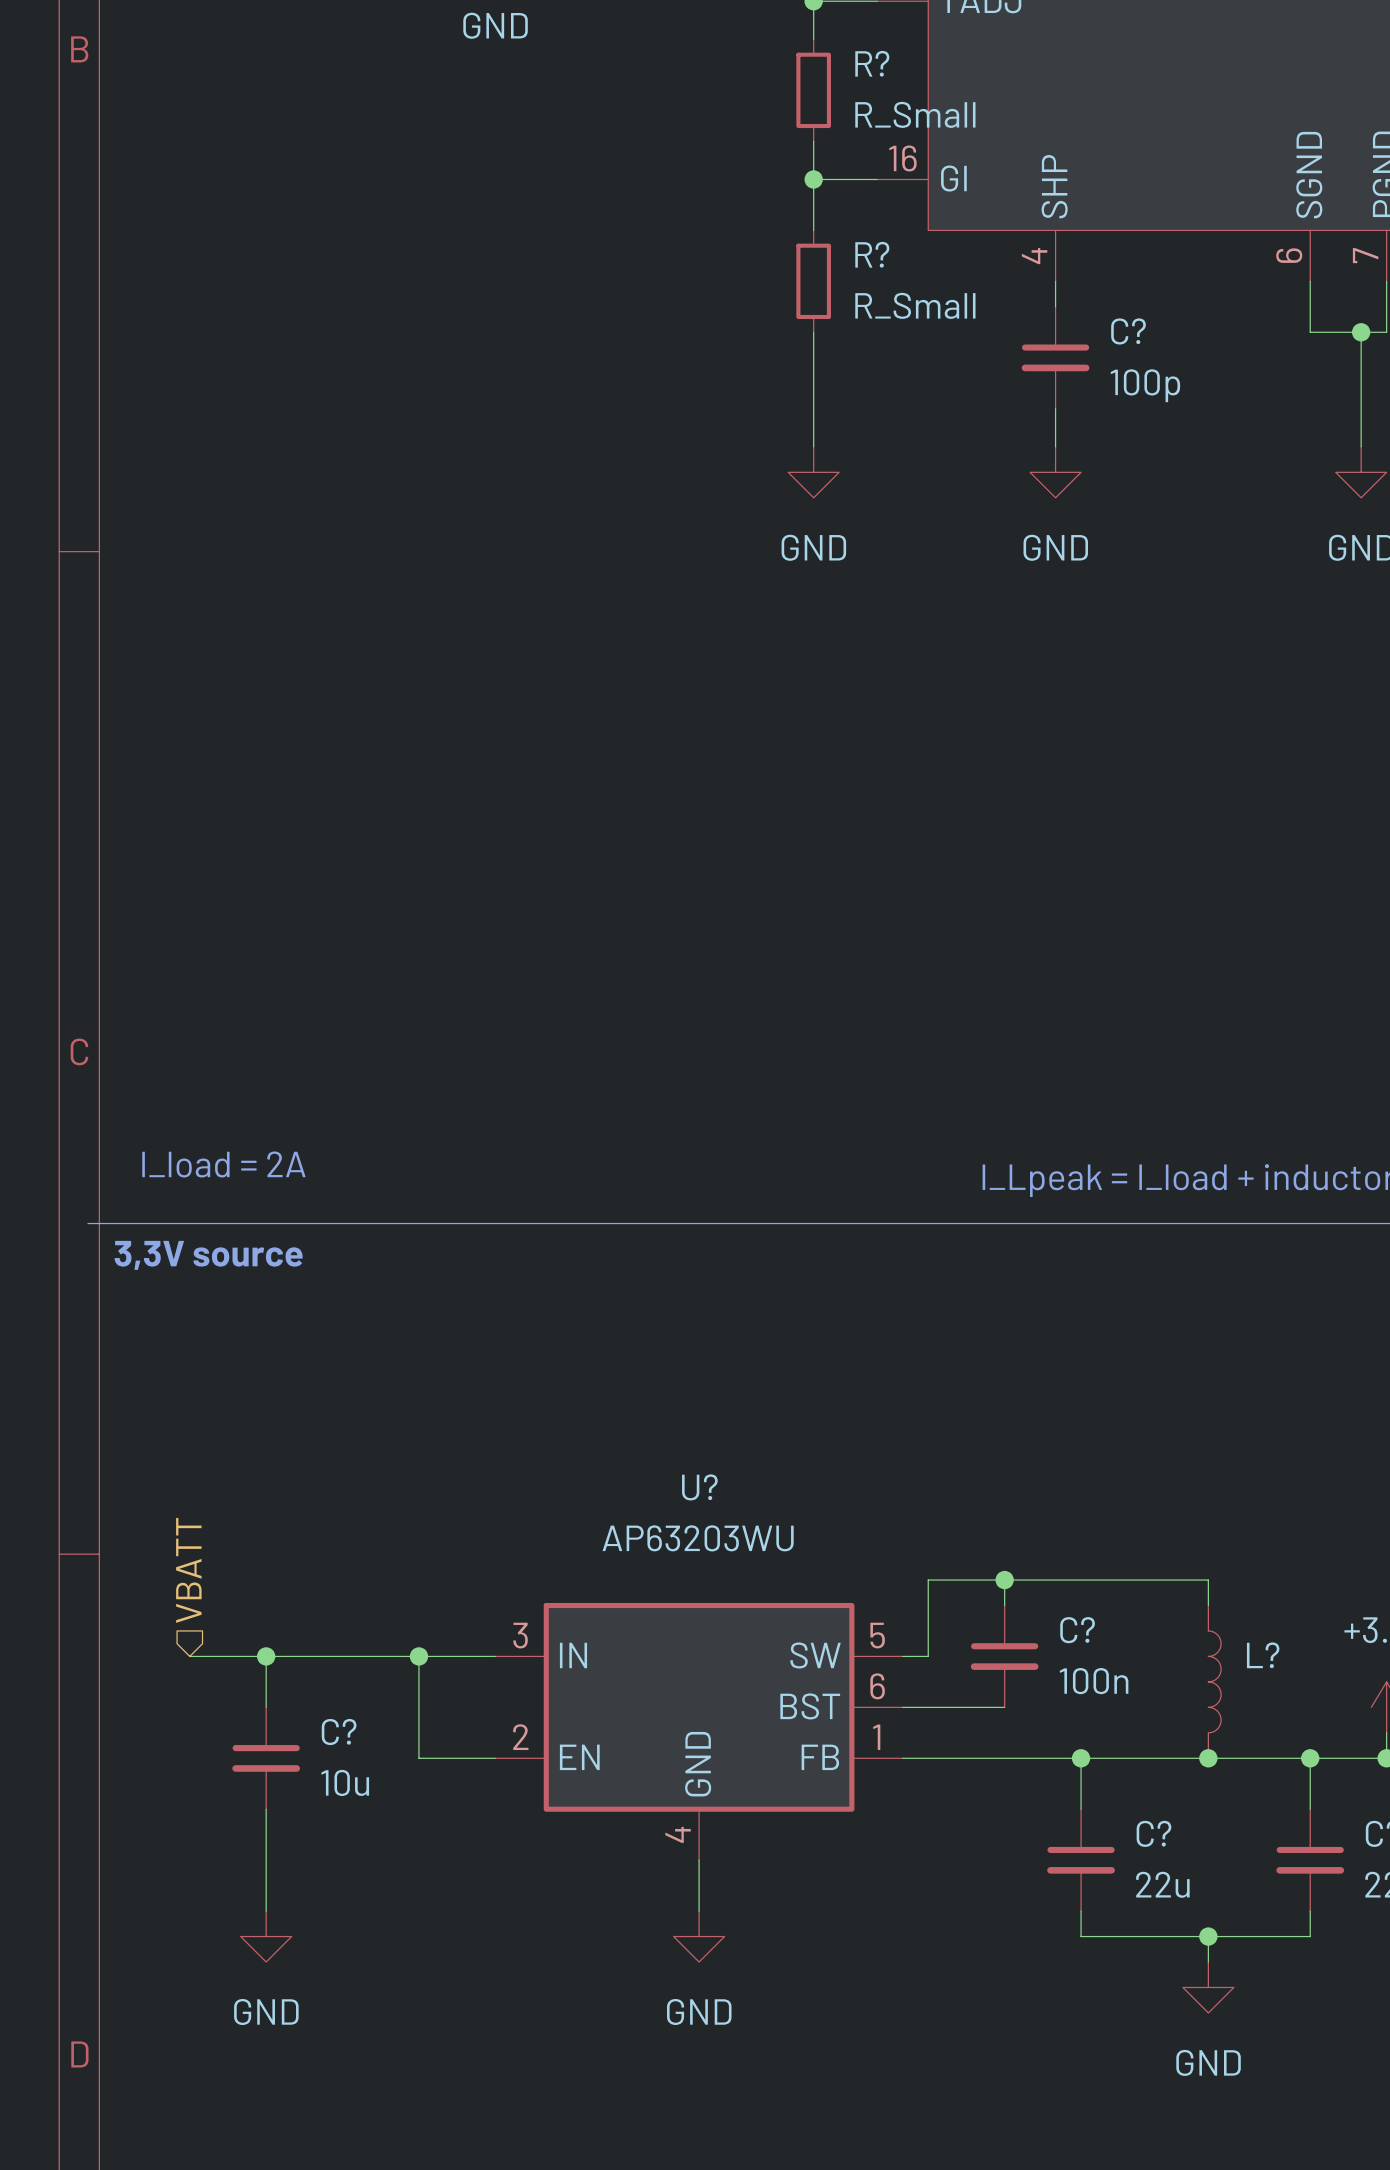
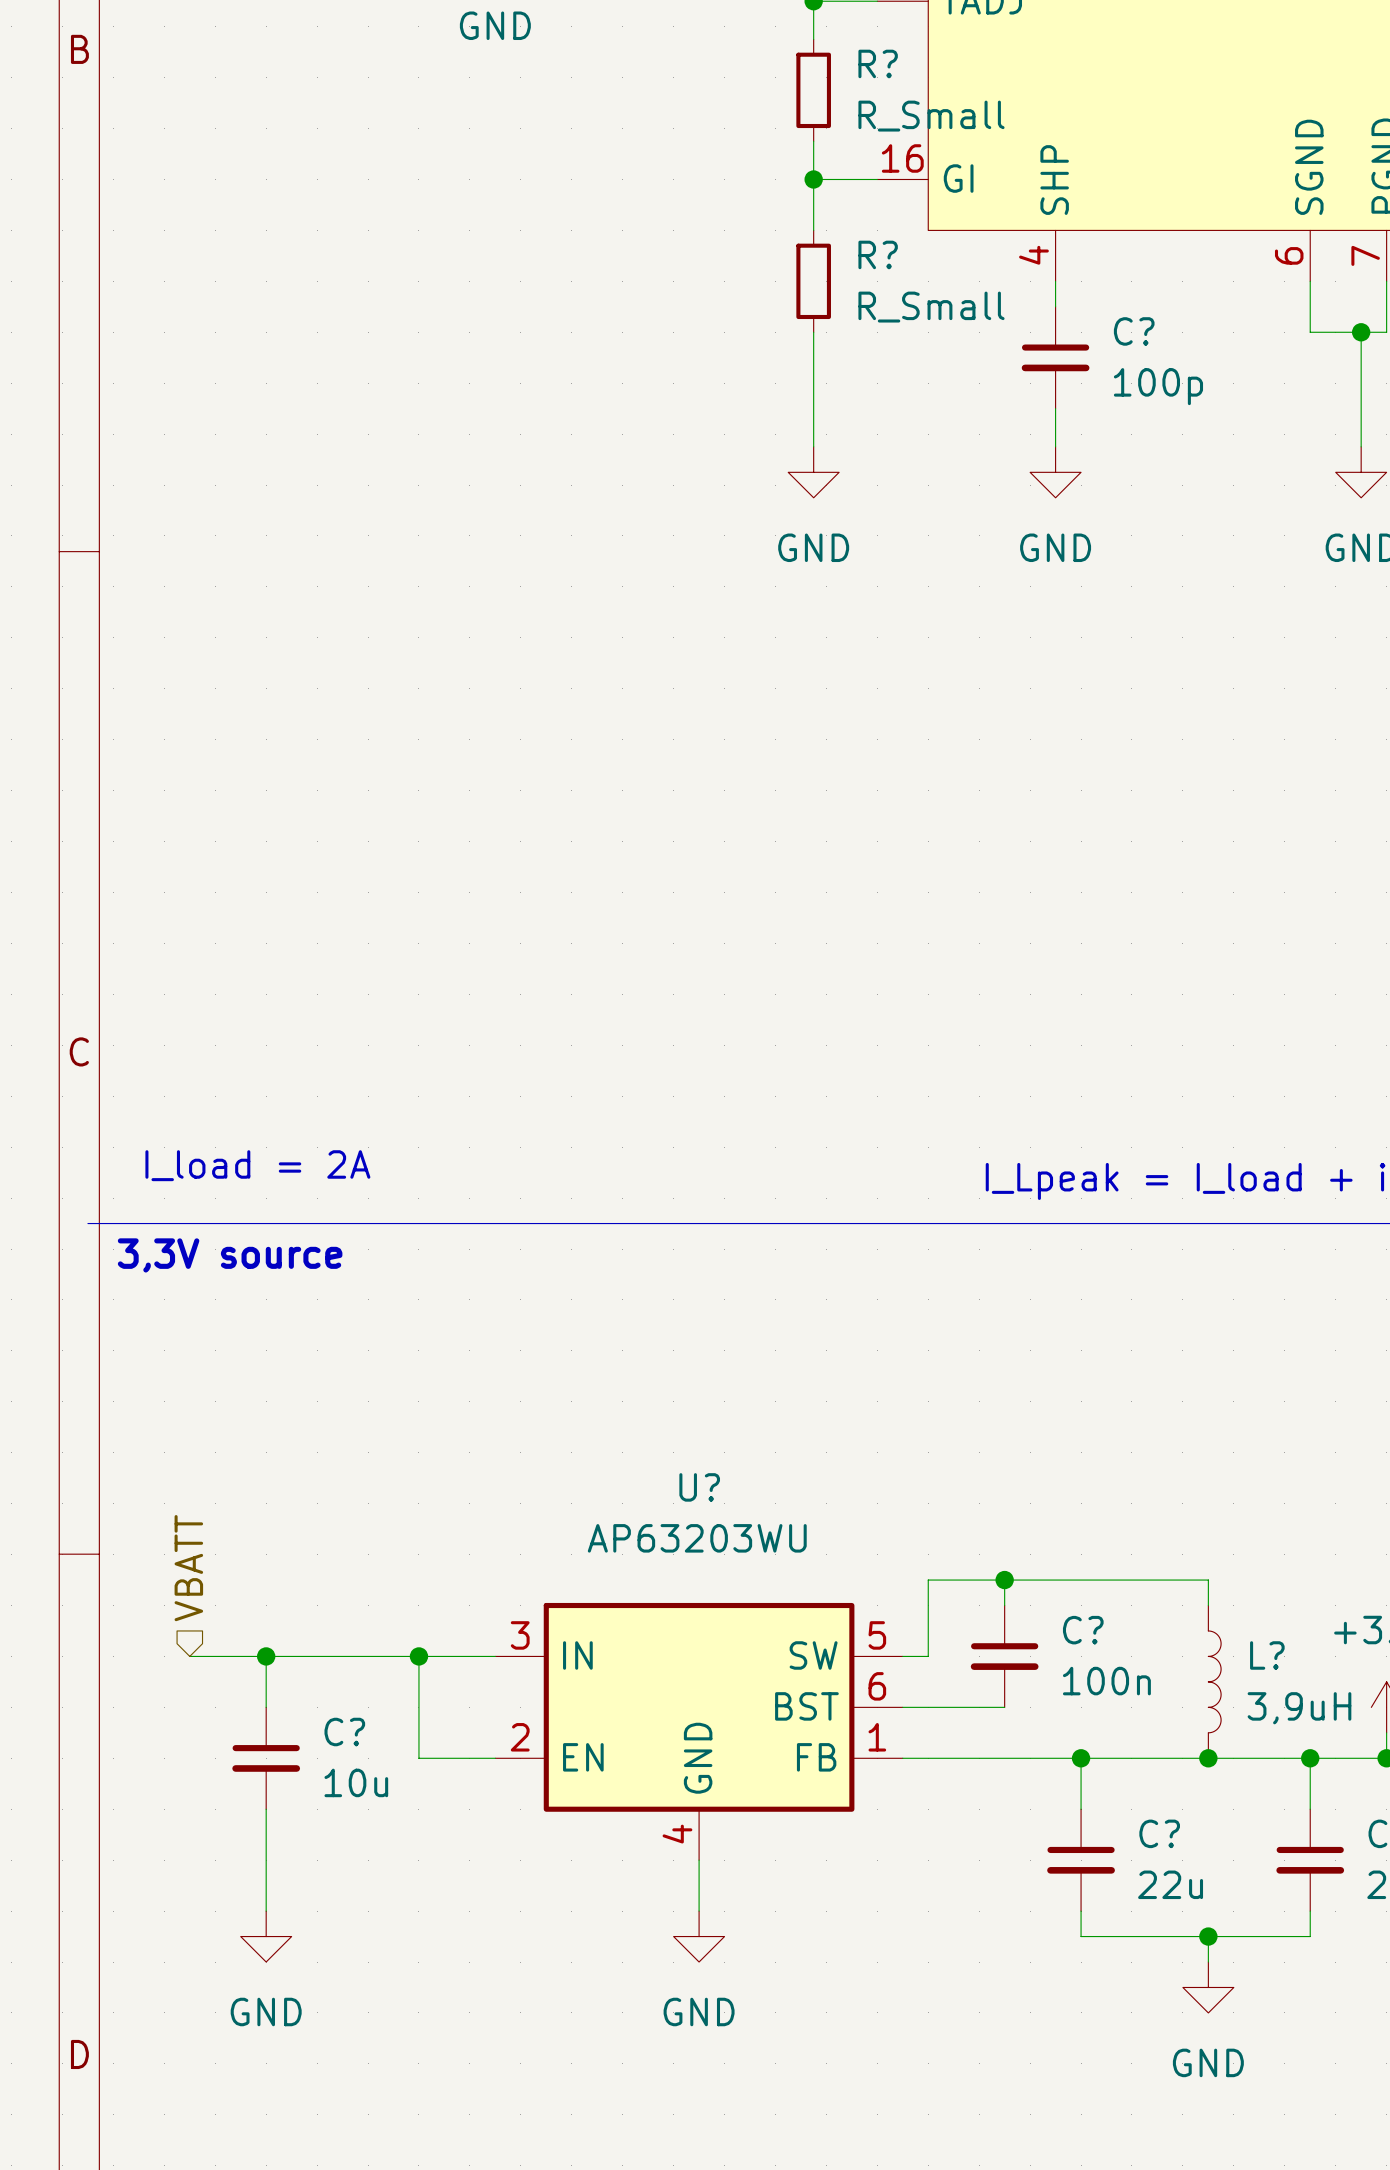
L? value: none -> 3,9uH (1299, 1708)

